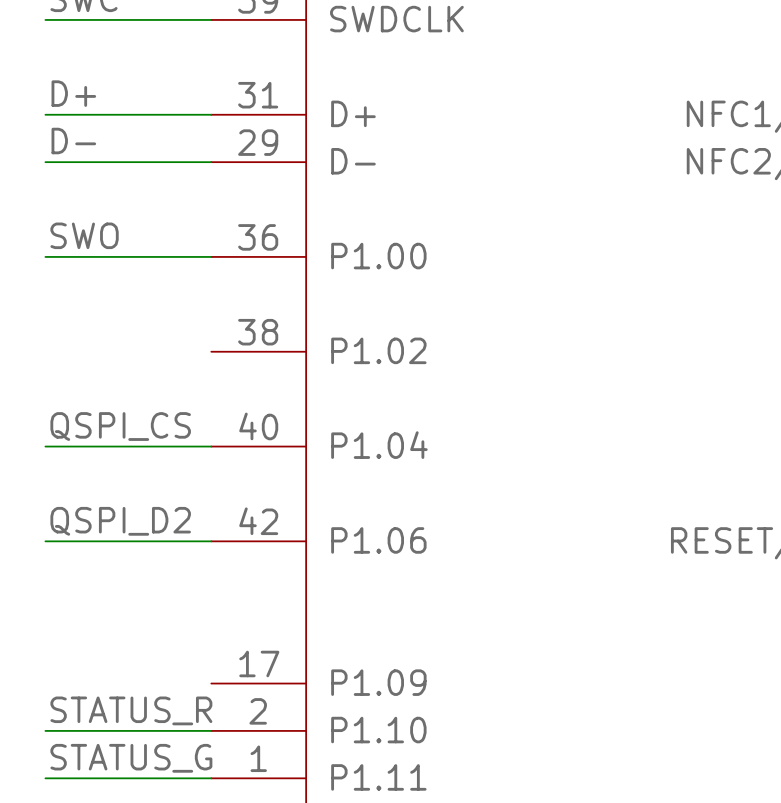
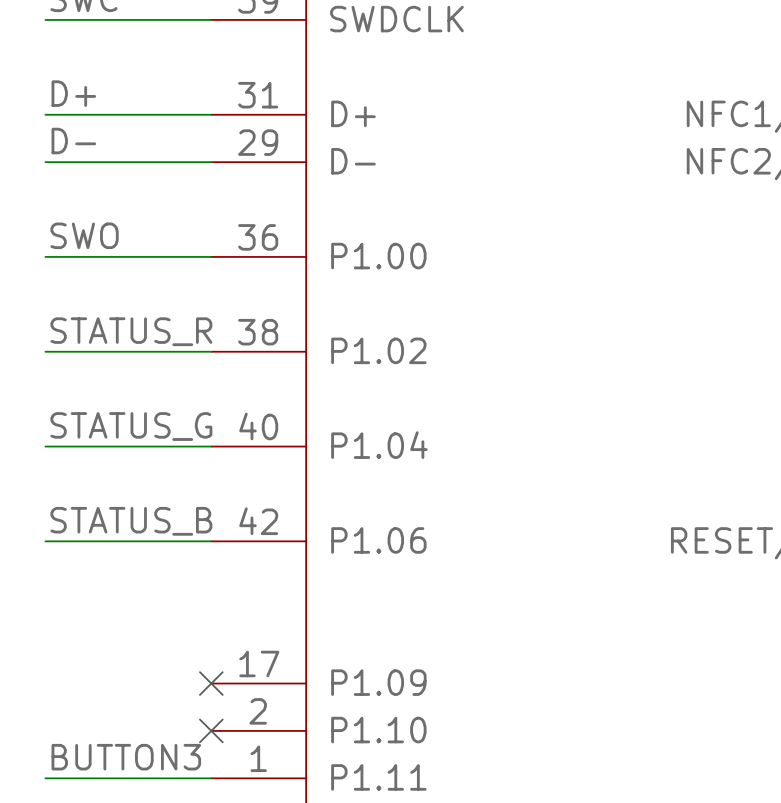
label: QSPI_CS (120, 426) -> STATUS_G (131, 426)
label: QSPI_D2 (120, 521) -> STATUS_B (131, 521)
no-connect mark: none -> (211, 683)
label position: STATUS_R (131, 710) -> STATUS_R (131, 331)
wire: (45, 730) (211, 730) -> (45, 351) (211, 351)
no-connect mark: none -> (211, 730)
label: STATUS_G (131, 758) -> BUTTON3 (126, 757)

